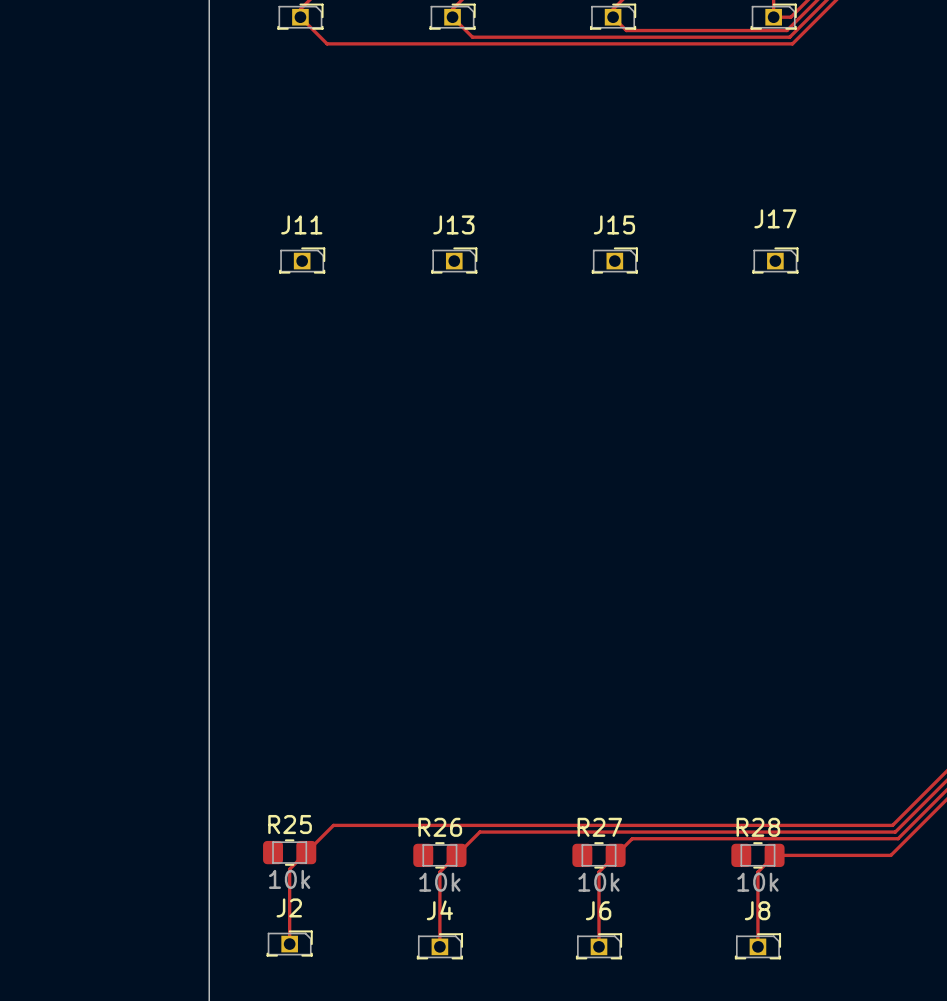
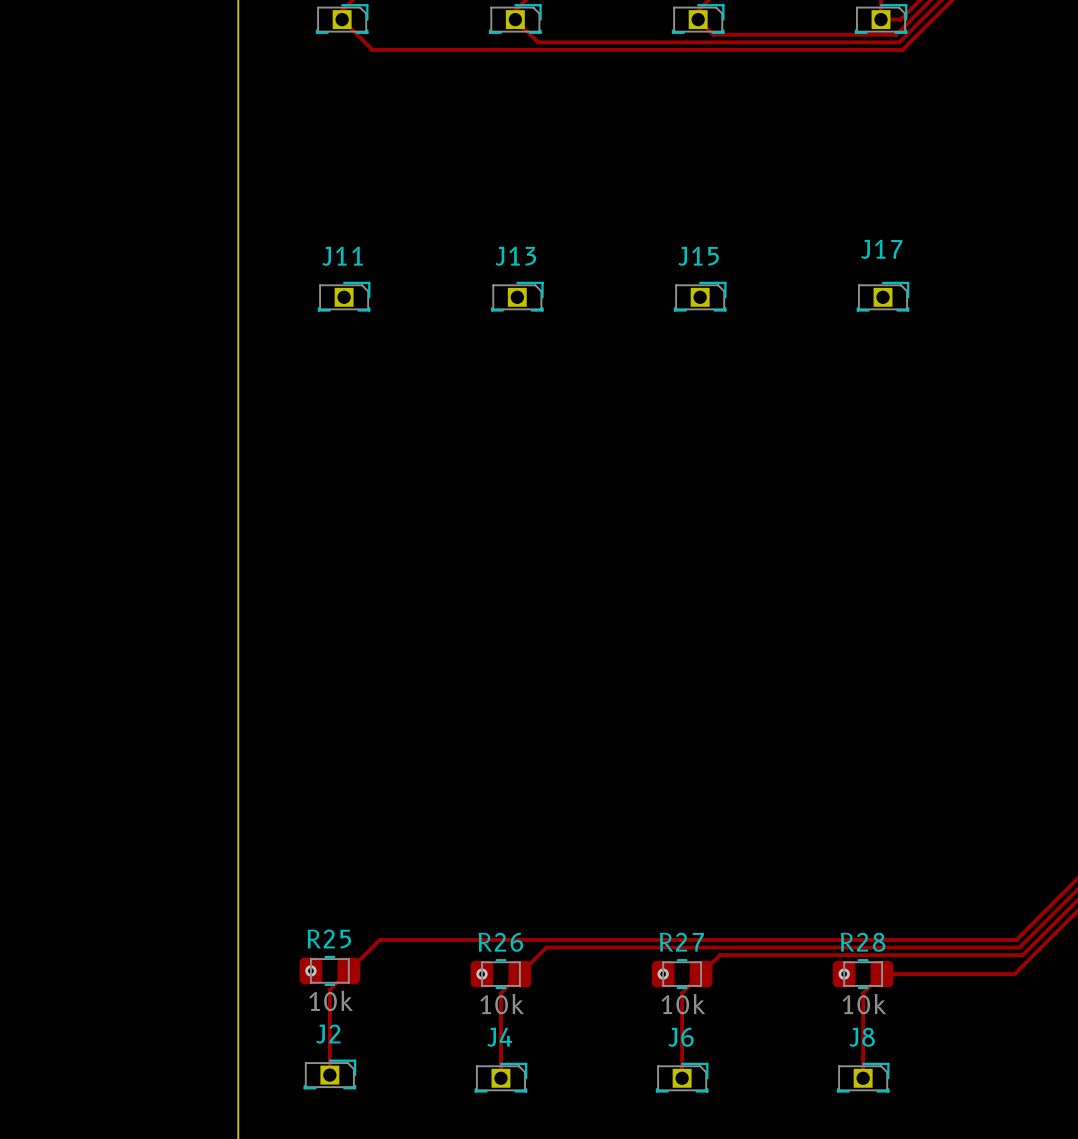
via: none -> (310, 970)
via: none -> (482, 974)
via: none -> (663, 974)
via: none -> (844, 974)

